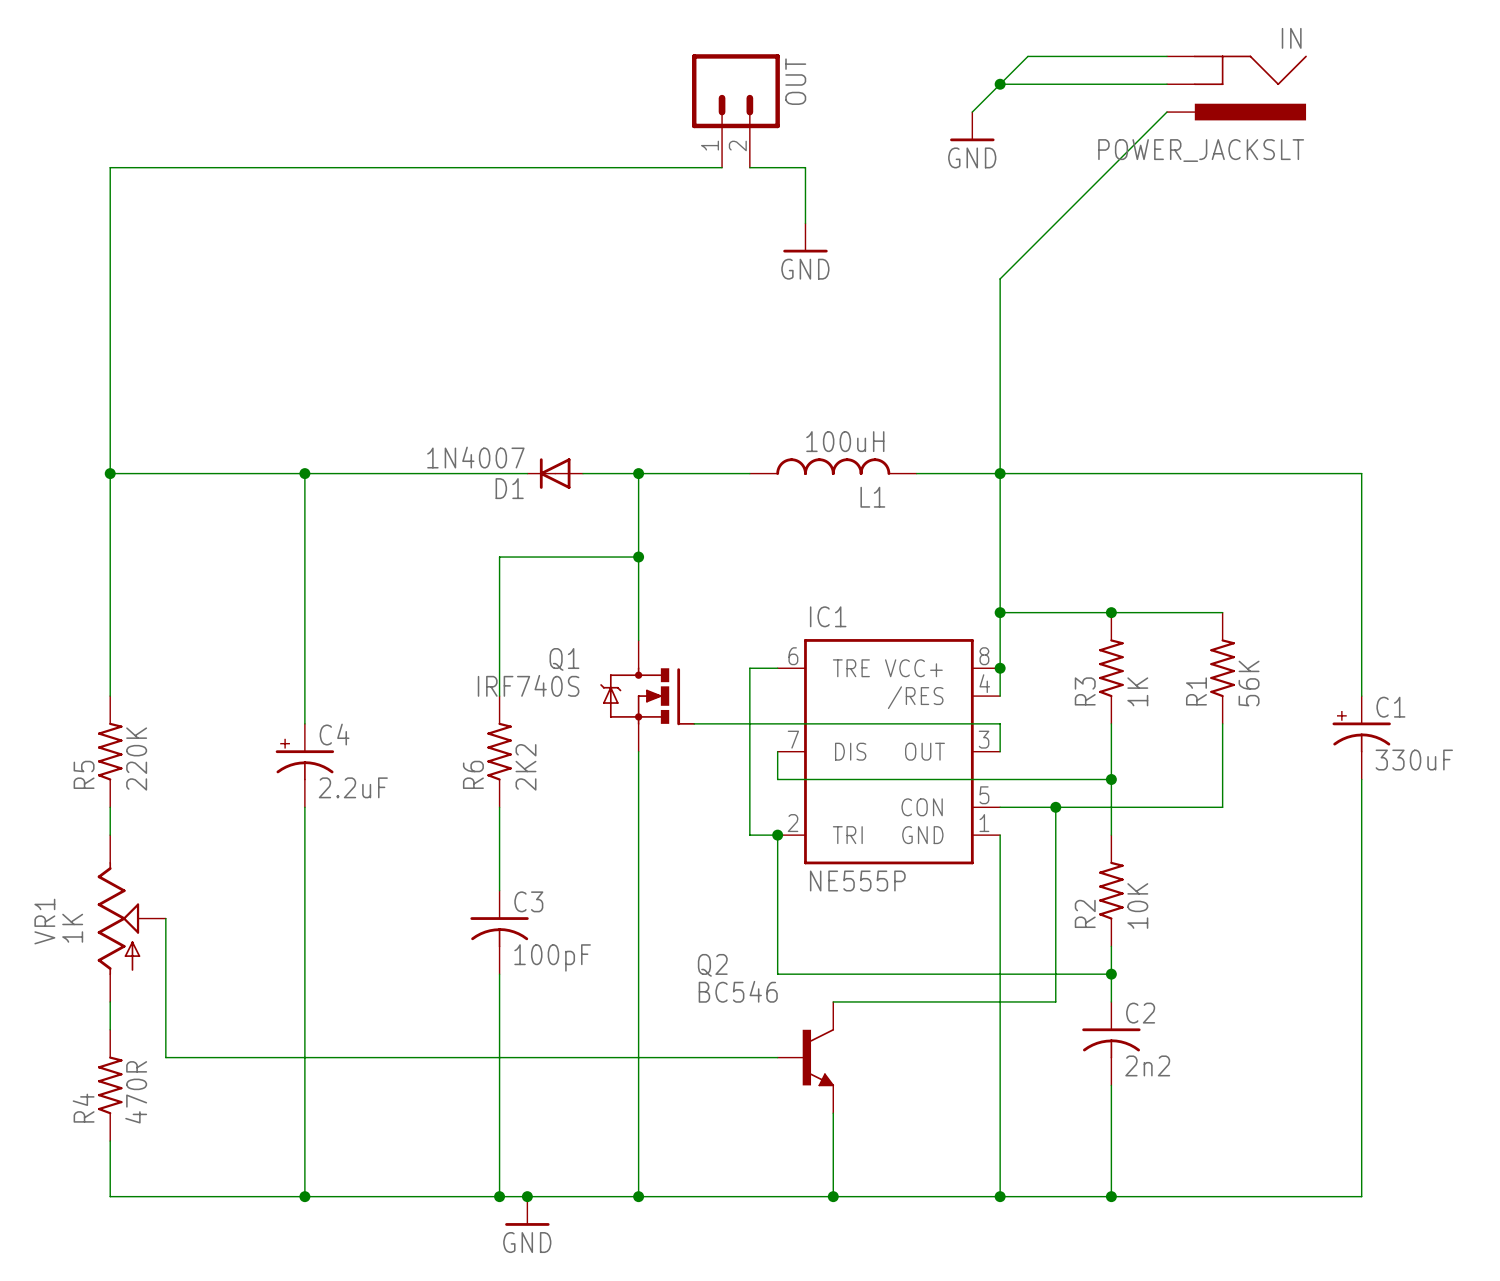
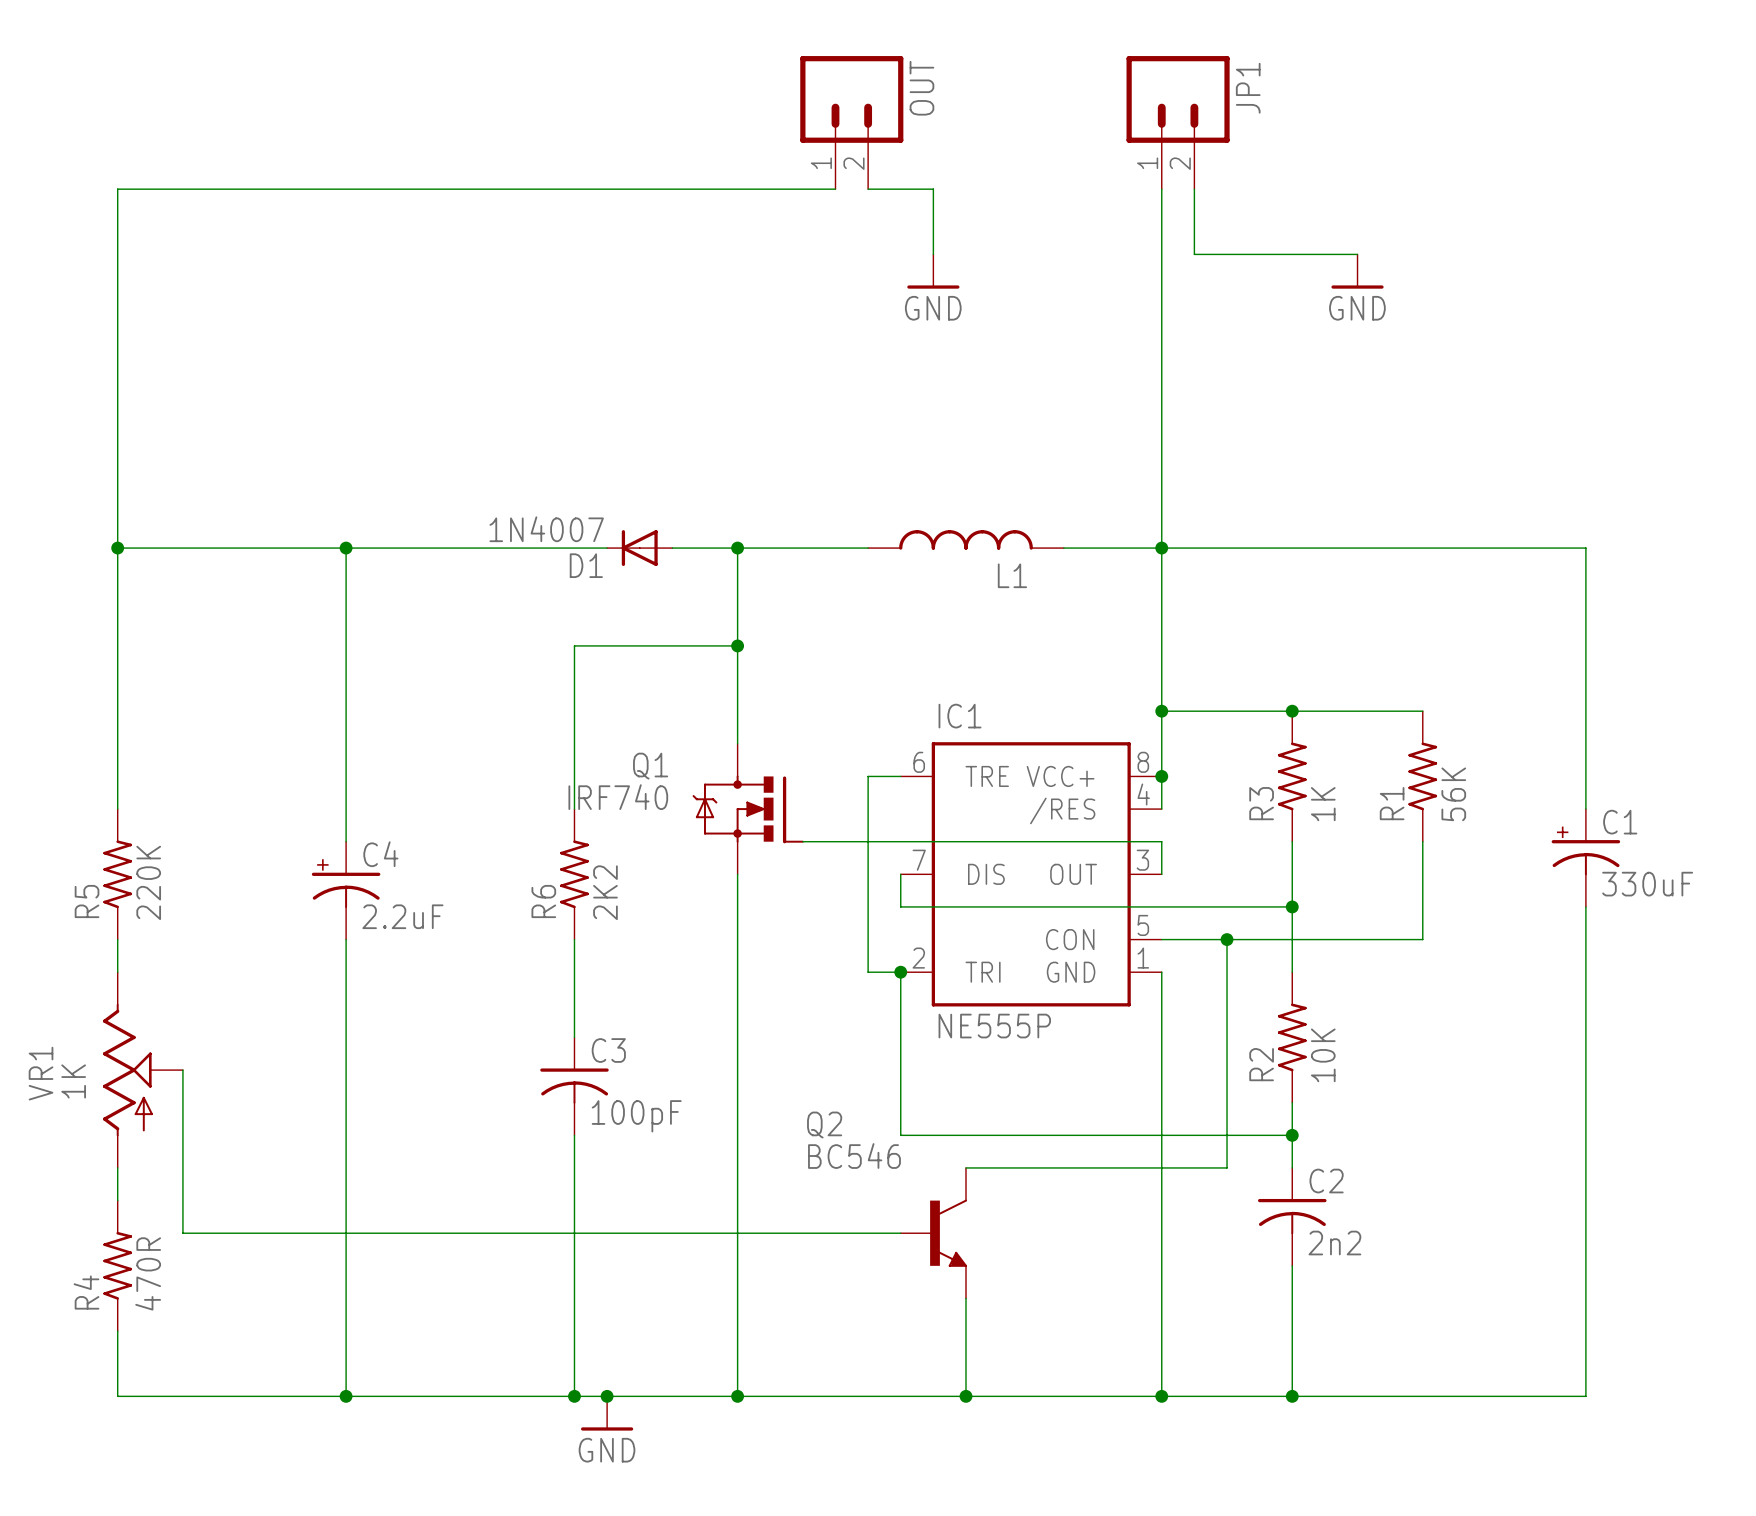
wire: (1167, 56) (1027, 56) (972, 112) -> none
wire: (1000, 84) (1167, 84) -> none
junction: (1000, 84) -> none
IN: POWER_JACKSLT (1236, 88) -> none
JP1: none -> (1178, 122)
wire: (1167, 112) (1000, 278) -> (1161, 189) (1161, 319)
power symbol position: GND (972, 126) -> GND (1357, 271)
wire: none -> (1194, 189) (1194, 254) (1357, 254)
L1 value: 100uH (845, 441) -> none
Q1 value: IRF740S (528, 685) -> IRF740 (618, 797)

